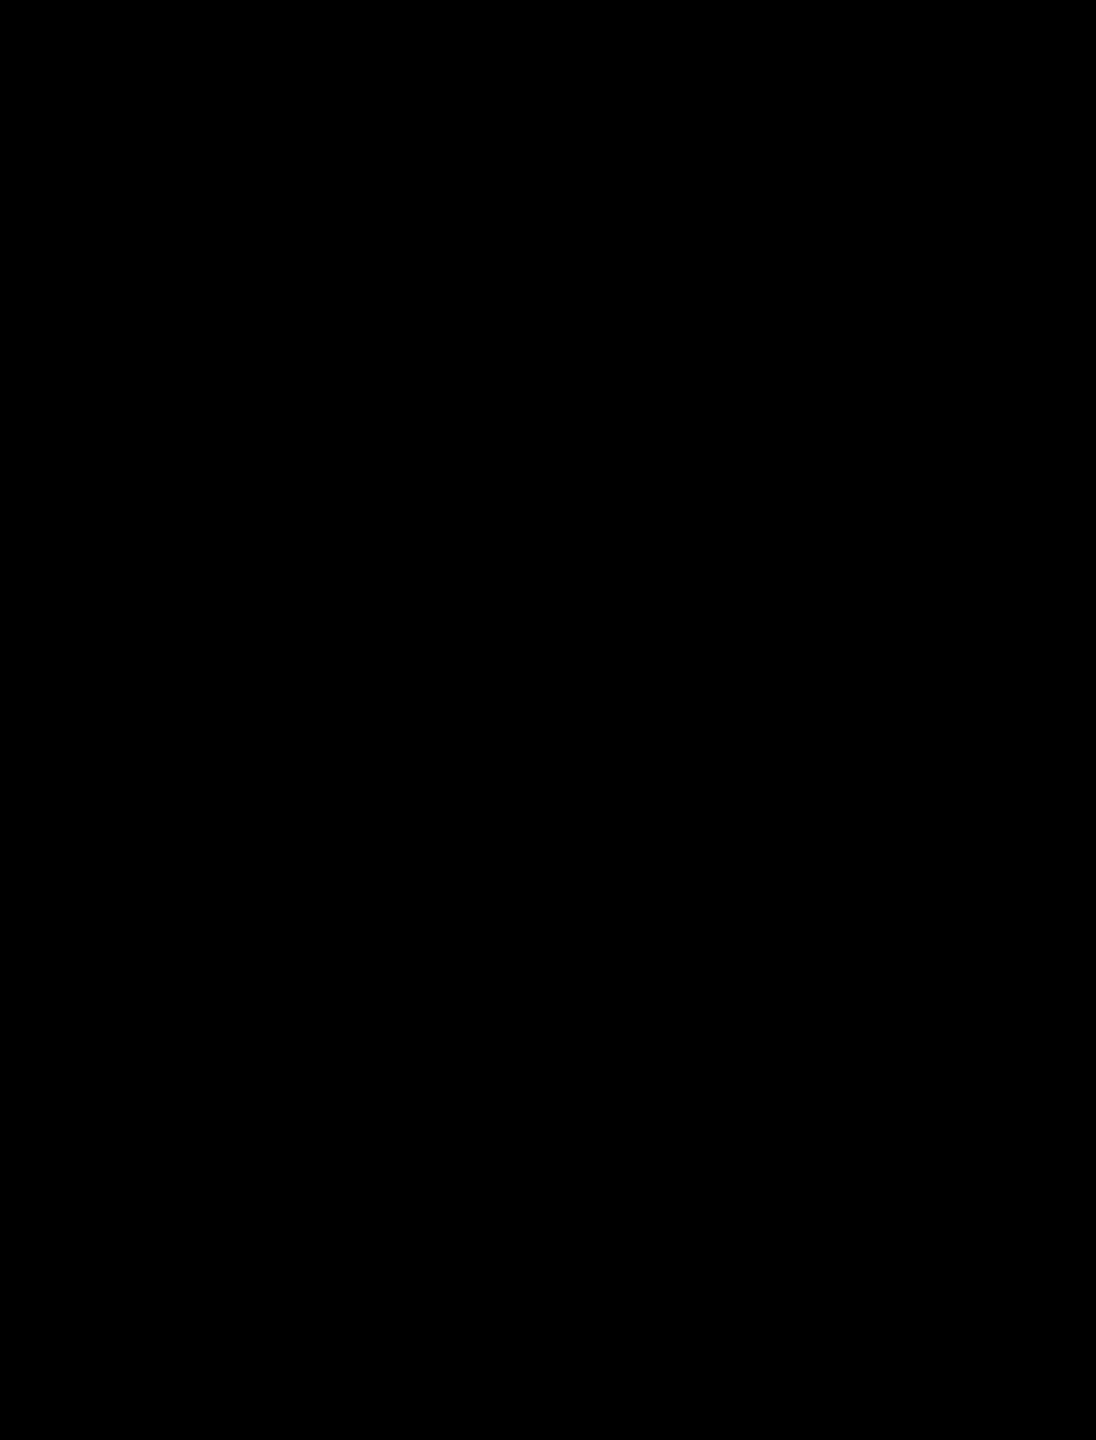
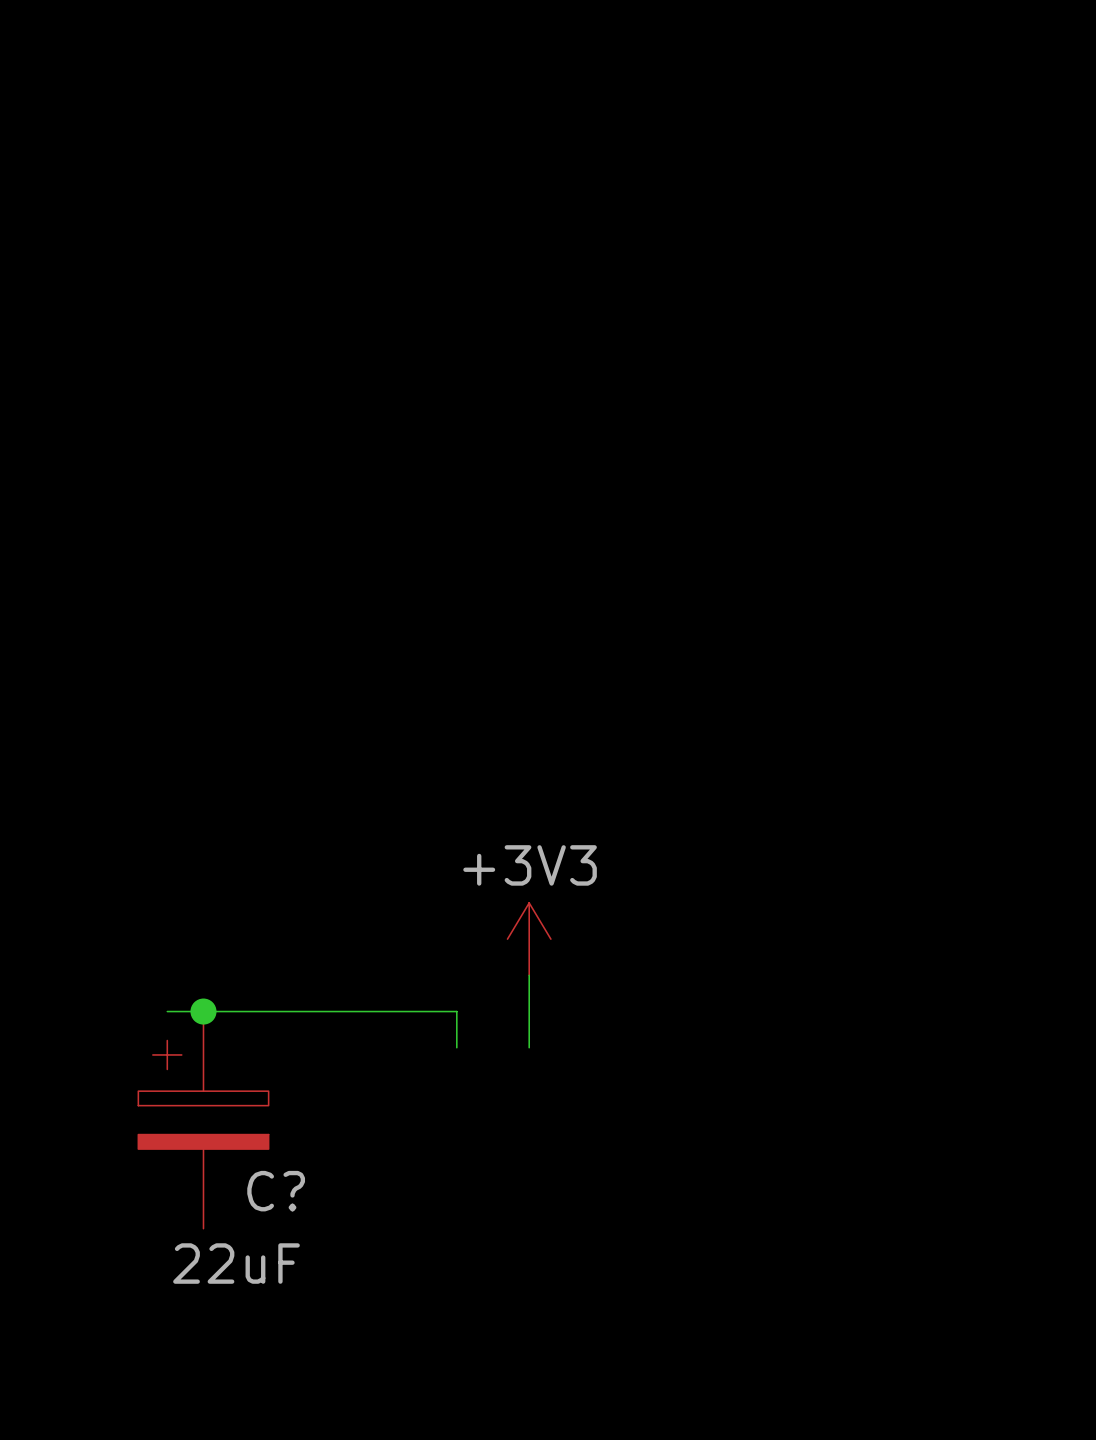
power symbol: none -> +3V3 (529, 939)
wire: none -> (529, 975) (529, 1047)
wire: none -> (167, 1011) (456, 1011) (456, 1047)
junction: none -> (203, 1011)
C?: none -> 22uF (203, 1120)

